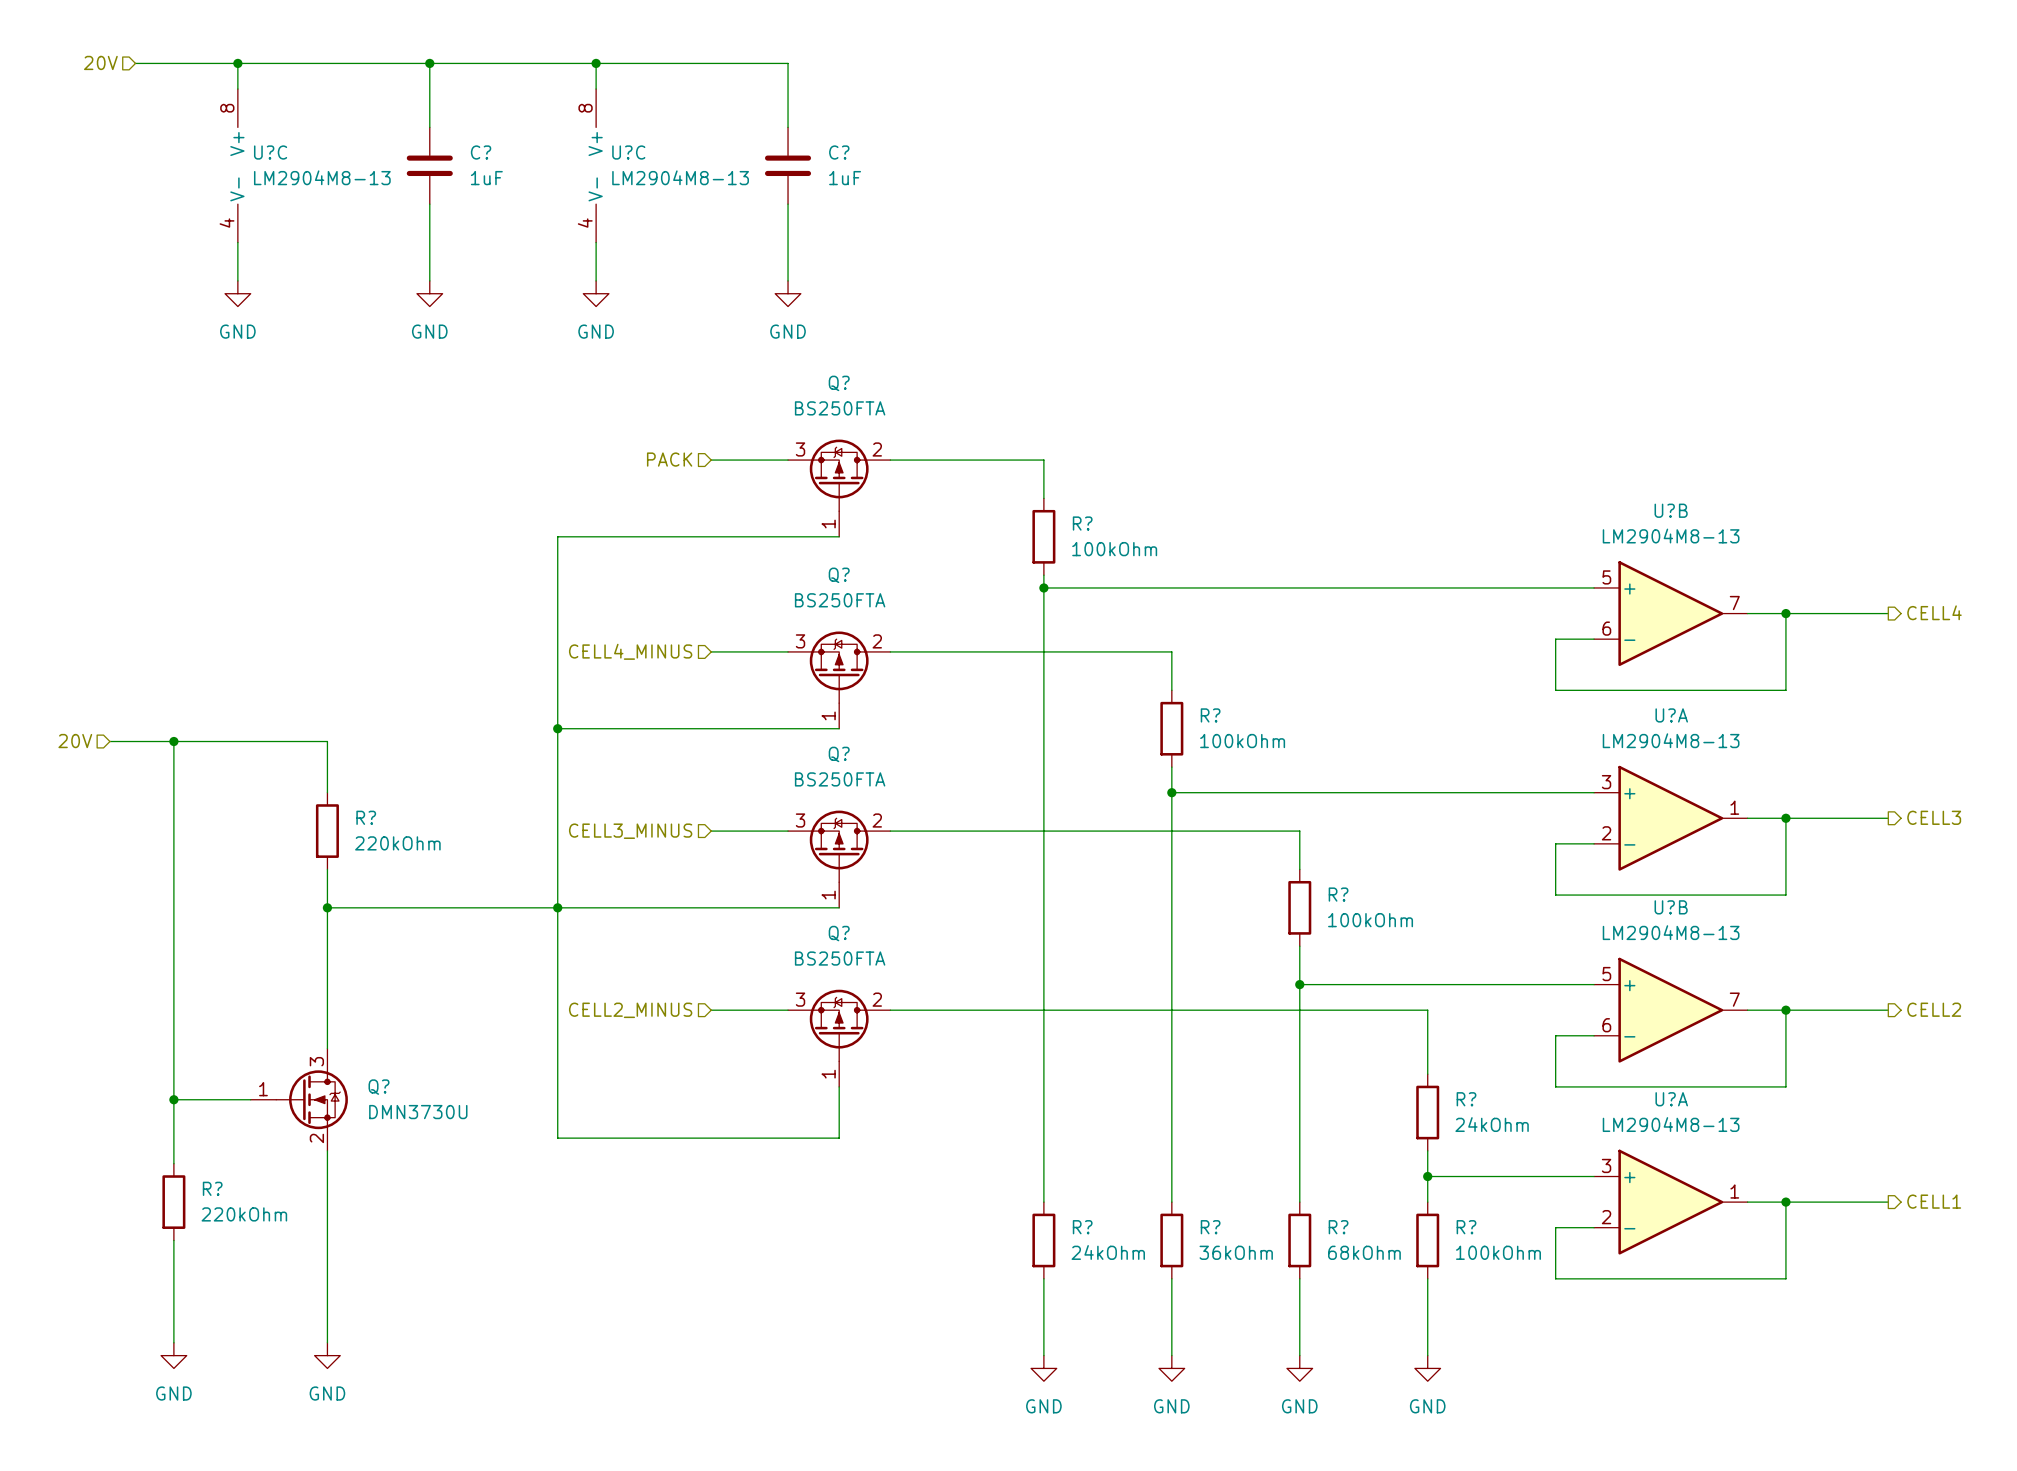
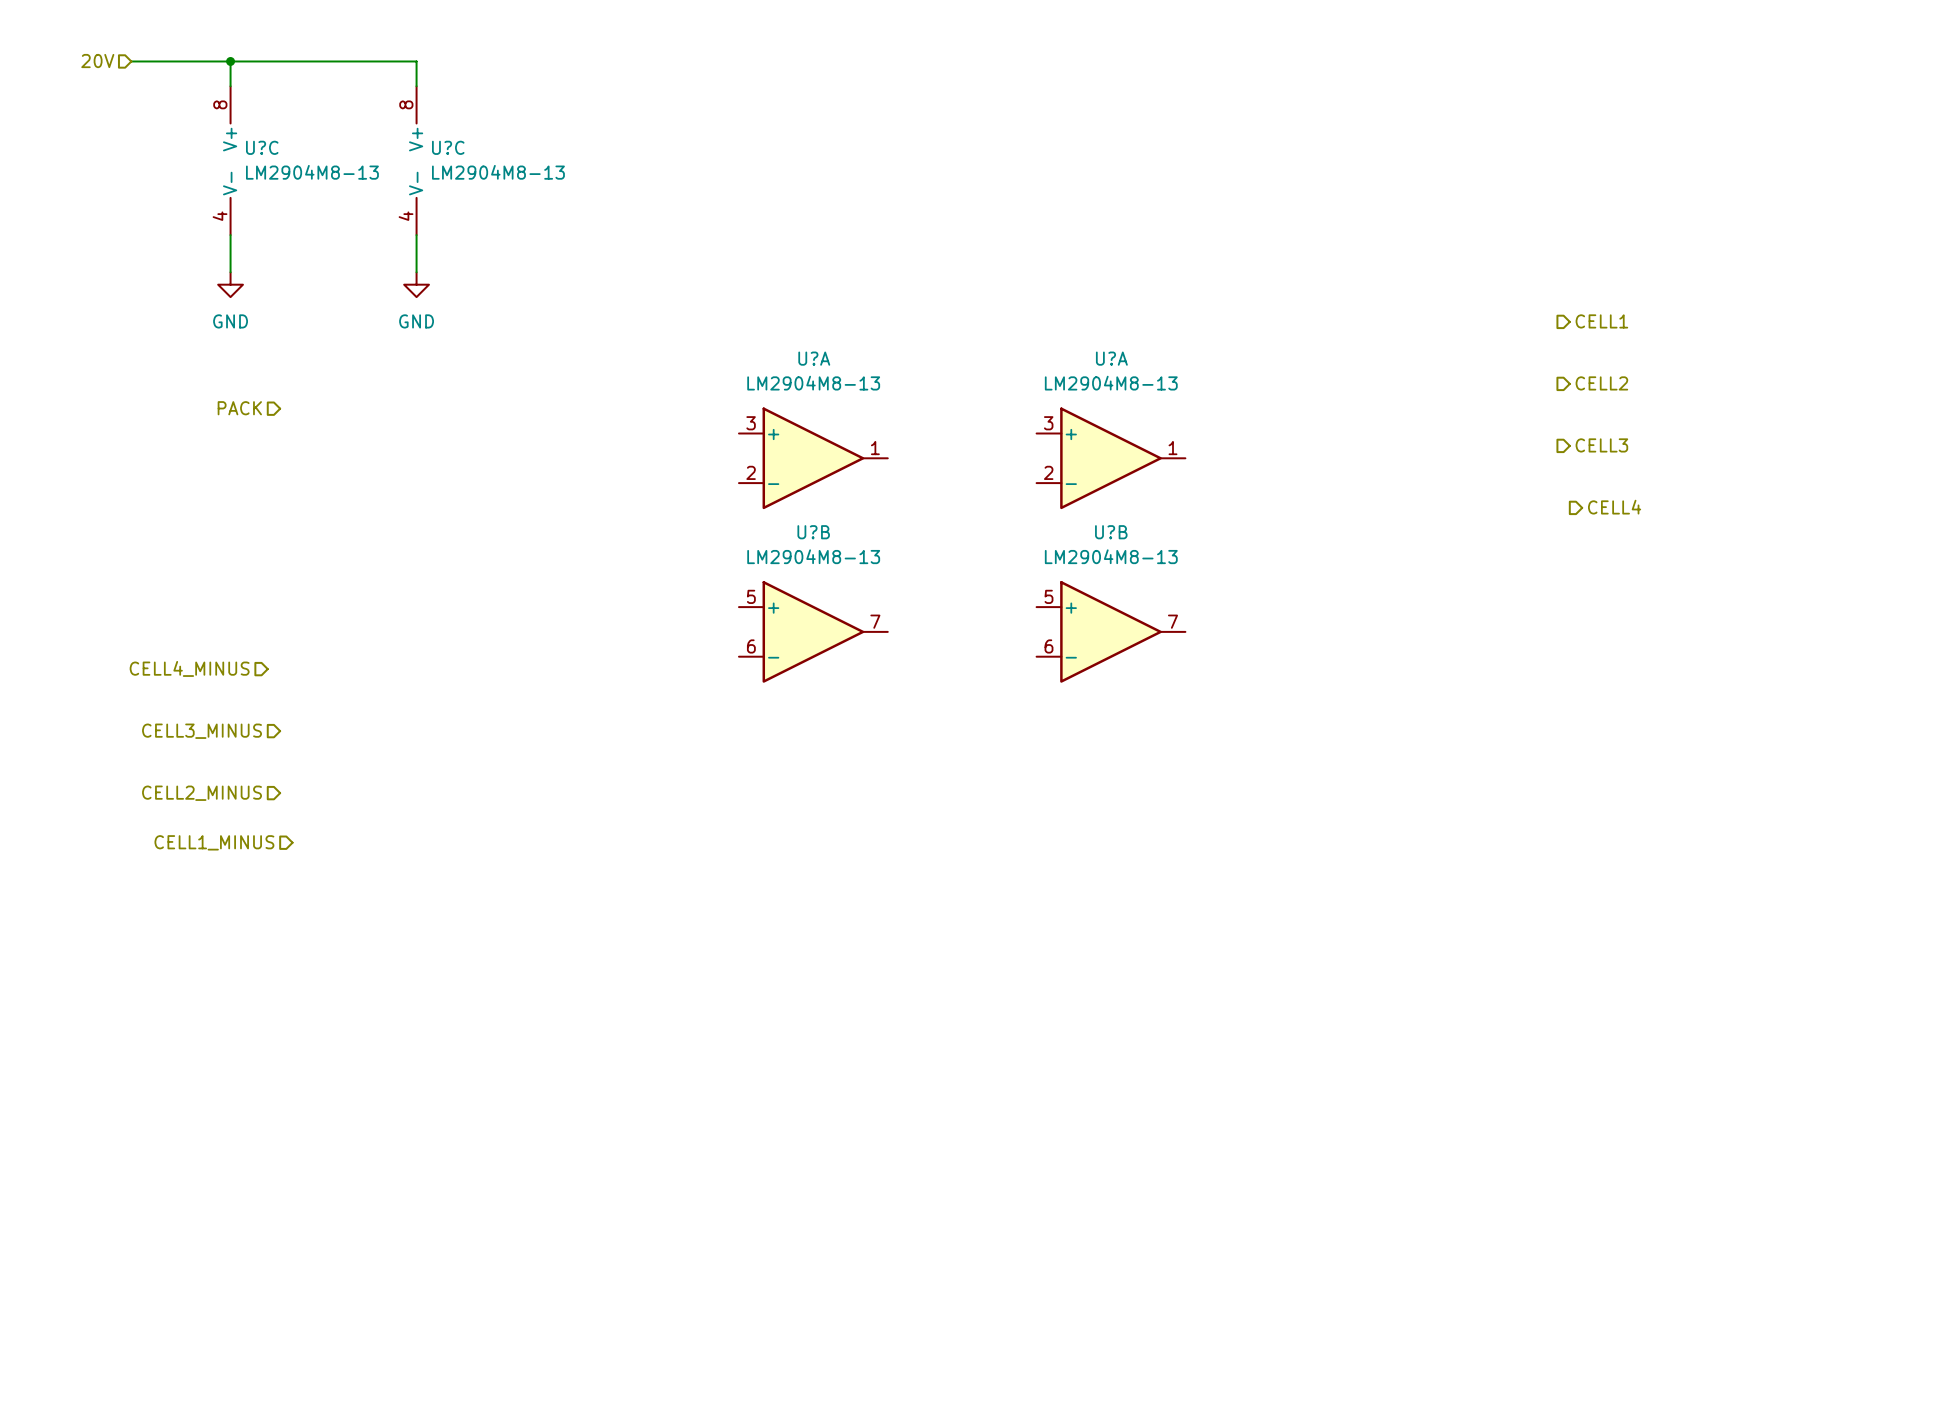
wire: (429, 63) (788, 63) (788, 127) -> none
junction: (429, 63) -> none
wire: (596, 63) (596, 89) -> none
junction: (596, 63) -> none
C?: 1uF (429, 165) -> none
U?C position: (596, 165) -> (416, 160)
C?: 1uF (788, 165) -> none
wire: (788, 204) (788, 280) -> none
wire: (596, 242) (596, 280) -> none
power symbol: GND (596, 293) -> none
power symbol: GND (788, 293) -> none
hierarchical label: none -> CELL1 (1601, 321)
hierarchical label: none -> CELL2 (1601, 383)
hierarchical label: none -> PACK (239, 408)
hierarchical label: PACK (669, 459) -> none
hierarchical label: none -> CELL3 (1601, 445)
wire: (711, 460) (788, 460) -> none
wire: (890, 460) (1043, 460) (1043, 498) -> none
U?A: none -> LM2904M8-13 (813, 458)
U?A: none -> LM2904M8-13 (1110, 458)
Q?: BS250FTA (839, 488) -> none
hierarchical label: none -> CELL4 (1614, 507)
wire: (839, 536) (557, 536) (557, 1138) (839, 1138) (839, 1086) -> none
R?: 100kOhm (1043, 536) -> none
wire: (1043, 575) (1043, 1202) -> none
wire: (1043, 587) (1594, 587) -> none
junction: (1043, 587) -> none
hierarchical label: CELL4 (1934, 612) -> none
U?B: LM2904M8-13 (1670, 613) -> none
wire: (1747, 613) (1888, 613) -> none
wire: (1785, 613) (1785, 690) (1555, 690) (1555, 639) (1594, 639) -> none
junction: (1785, 613) -> none
hierarchical label: CELL4_MINUS (630, 651) -> none
wire: (711, 651) (788, 651) -> none
U?B: none -> LM2904M8-13 (813, 631)
wire: (890, 651) (1171, 651) (1171, 690) -> none
U?B: none -> LM2904M8-13 (1110, 631)
Q?: BS250FTA (839, 680) -> none
hierarchical label: none -> CELL4_MINUS (189, 668)
wire: (557, 728) (839, 728) -> none
junction: (557, 728) -> none
R?: 100kOhm (1171, 728) -> none
hierarchical label: 20V (75, 741) -> none
wire: (109, 741) (327, 741) (327, 792) -> none
wire: (173, 741) (173, 1163) -> none
junction: (173, 741) -> none
hierarchical label: none -> CELL3_MINUS (202, 731)
wire: (1171, 767) (1171, 1202) -> none
wire: (1171, 792) (1594, 792) -> none
junction: (1171, 792) -> none
hierarchical label: CELL3 (1934, 817) -> none
hierarchical label: none -> CELL2_MINUS (202, 793)
U?A: LM2904M8-13 (1670, 818) -> none
wire: (1747, 818) (1888, 818) -> none
wire: (1785, 818) (1785, 895) (1555, 895) (1555, 843) (1594, 843) -> none
junction: (1785, 818) -> none
R?: 220kOhm (327, 831) -> none
hierarchical label: CELL3_MINUS (630, 831) -> none
wire: (711, 831) (788, 831) -> none
wire: (890, 831) (1299, 831) (1299, 869) -> none
Q?: BS250FTA (839, 859) -> none
hierarchical label: none -> CELL1_MINUS (214, 842)
wire: (327, 869) (327, 1048) -> none
wire: (327, 907) (839, 907) -> none
junction: (327, 907) -> none
junction: (557, 907) -> none
R?: 100kOhm (1299, 907) -> none
wire: (1299, 946) (1299, 1202) -> none
wire: (1299, 984) (1594, 984) -> none
junction: (1299, 984) -> none
hierarchical label: CELL2 (1934, 1009) -> none
hierarchical label: CELL2_MINUS (630, 1010) -> none
wire: (711, 1010) (788, 1010) -> none
wire: (890, 1010) (1427, 1010) (1427, 1074) -> none
U?B: LM2904M8-13 (1670, 1010) -> none
wire: (1747, 1010) (1888, 1010) -> none
wire: (1785, 1010) (1785, 1086) (1555, 1086) (1555, 1035) (1594, 1035) -> none
junction: (1785, 1010) -> none
Q?: BS250FTA (839, 1038) -> none
wire: (173, 1099) (250, 1099) -> none
junction: (173, 1099) -> none
Q?: DMN3730U (299, 1099) -> none
R?: 24kOhm (1427, 1112) -> none
wire: (327, 1150) (327, 1342) -> none
wire: (1427, 1150) (1427, 1202) -> none
wire: (1427, 1176) (1594, 1176) -> none
junction: (1427, 1176) -> none
hierarchical label: CELL1 (1934, 1201) -> none
R?: 220kOhm (173, 1202) -> none
U?A: LM2904M8-13 (1670, 1202) -> none
wire: (1747, 1202) (1888, 1202) -> none
wire: (1785, 1202) (1785, 1278) (1555, 1278) (1555, 1227) (1594, 1227) -> none
junction: (1785, 1202) -> none
wire: (173, 1240) (173, 1342) -> none
R?: 24kOhm (1043, 1240) -> none
R?: 36kOhm (1171, 1240) -> none
R?: 68kOhm (1299, 1240) -> none
R?: 100kOhm (1427, 1240) -> none
wire: (1043, 1278) (1043, 1355) -> none
wire: (1171, 1278) (1171, 1355) -> none
wire: (1299, 1278) (1299, 1355) -> none
wire: (1427, 1278) (1427, 1355) -> none
power symbol: GND (173, 1355) -> none
power symbol: GND (327, 1355) -> none
power symbol: GND (1043, 1368) -> none
power symbol: GND (1171, 1368) -> none
power symbol: GND (1299, 1368) -> none
power symbol: GND (1427, 1368) -> none

